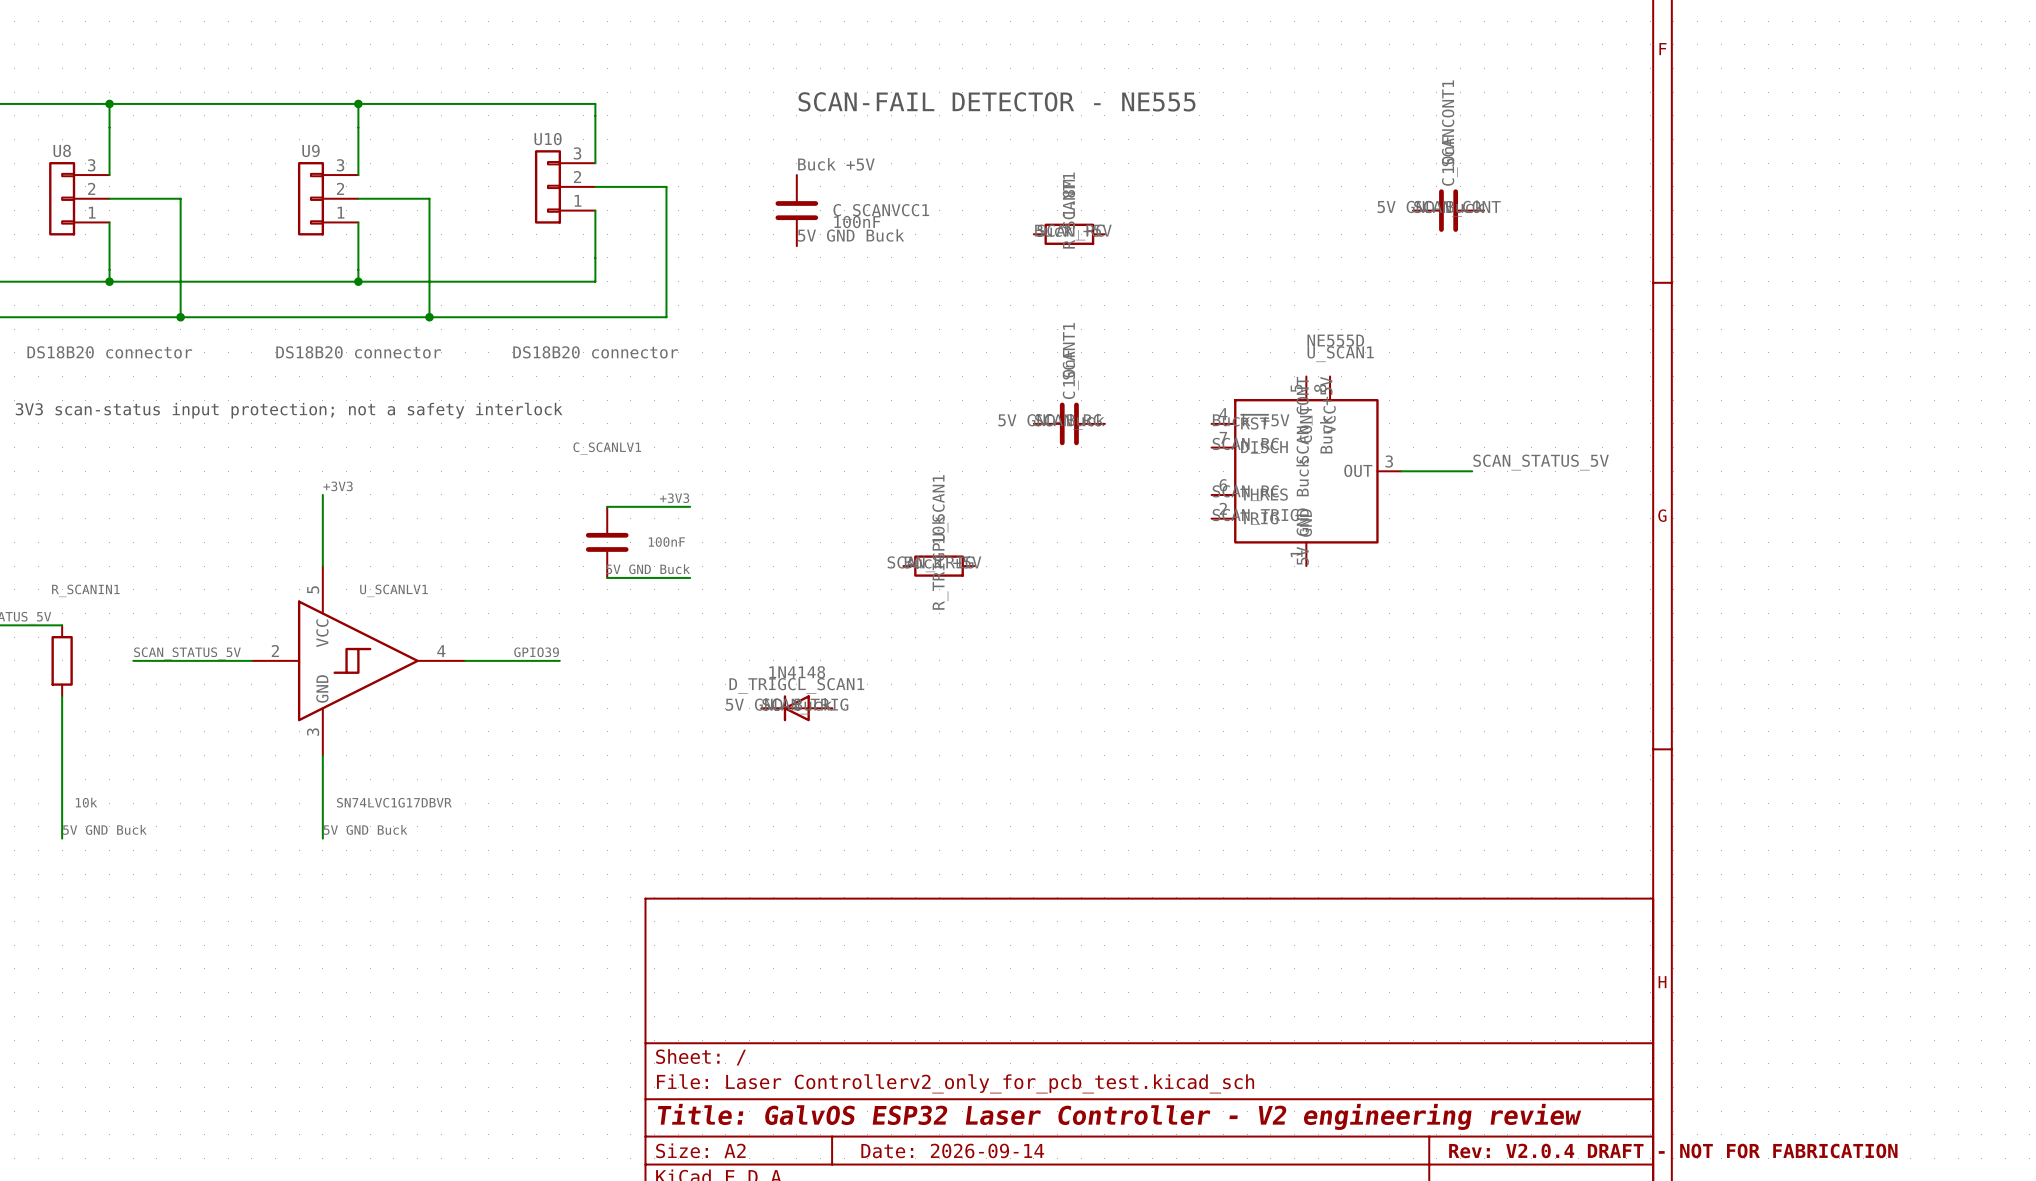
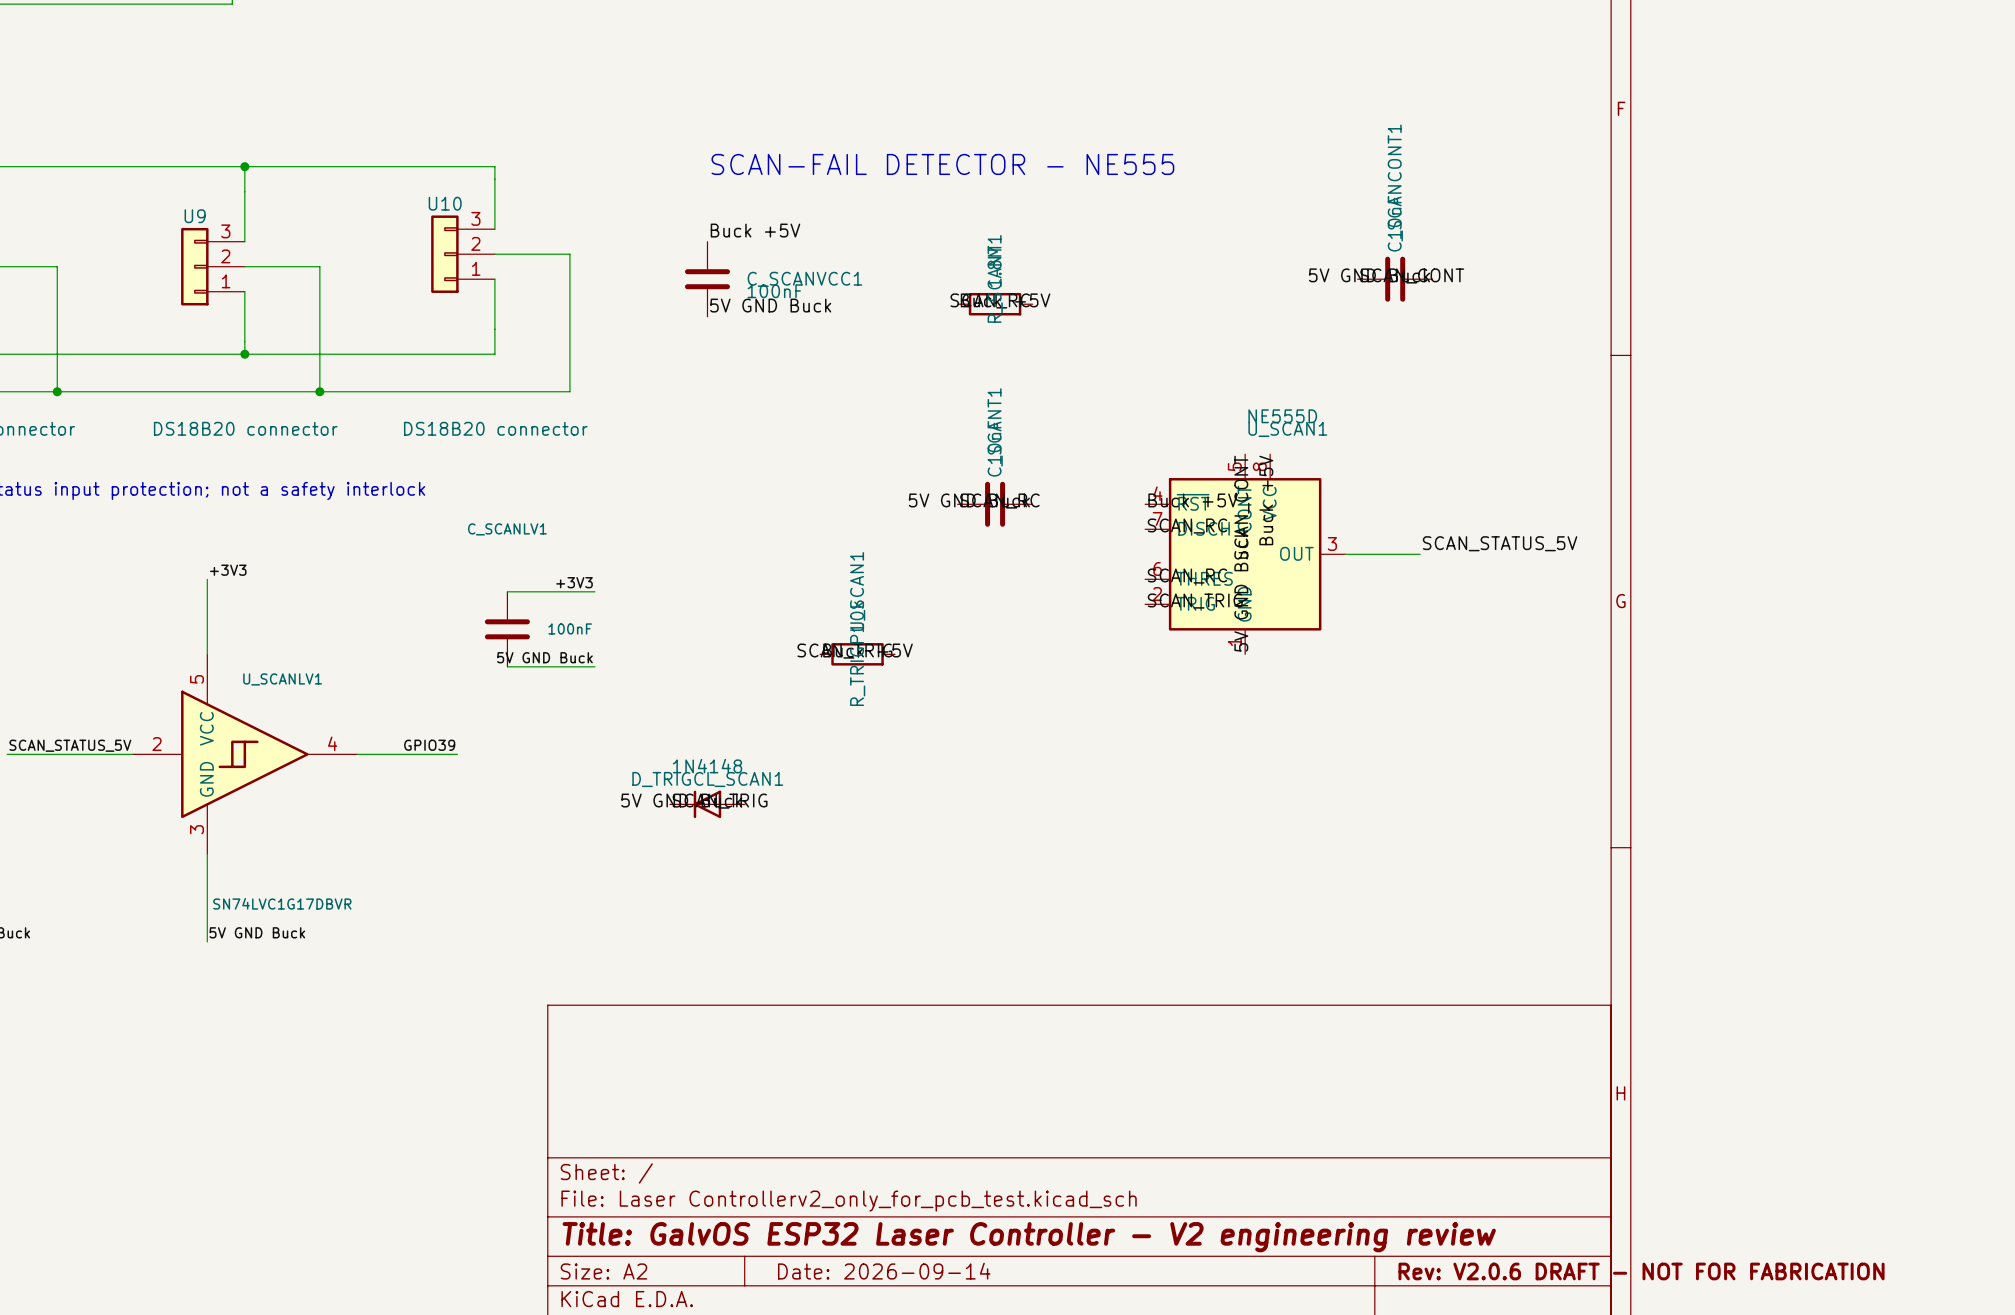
title block: Rev: V2.0.4 DRAFT - NOT FOR FABRICATION (1673, 1150) -> Rev: V2.0.6 DRAFT - NOT FOR FABRICATION (1641, 1271)

